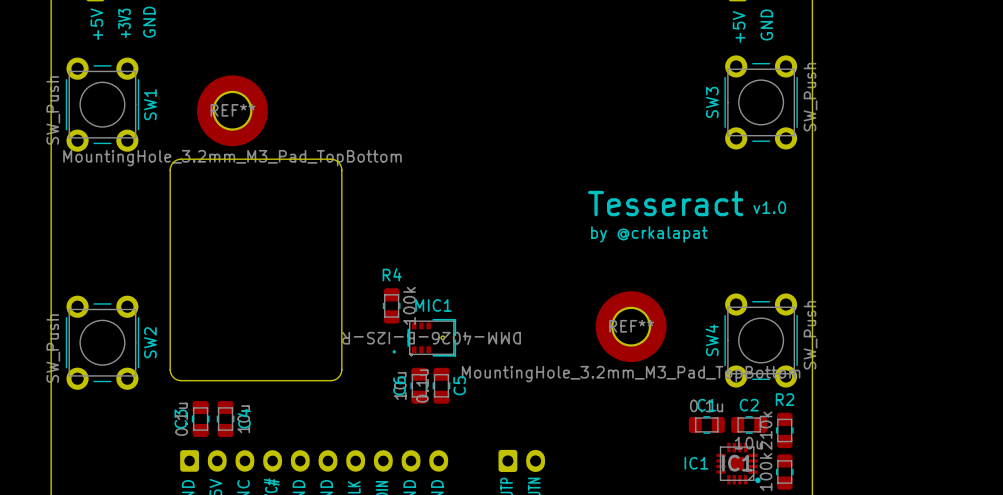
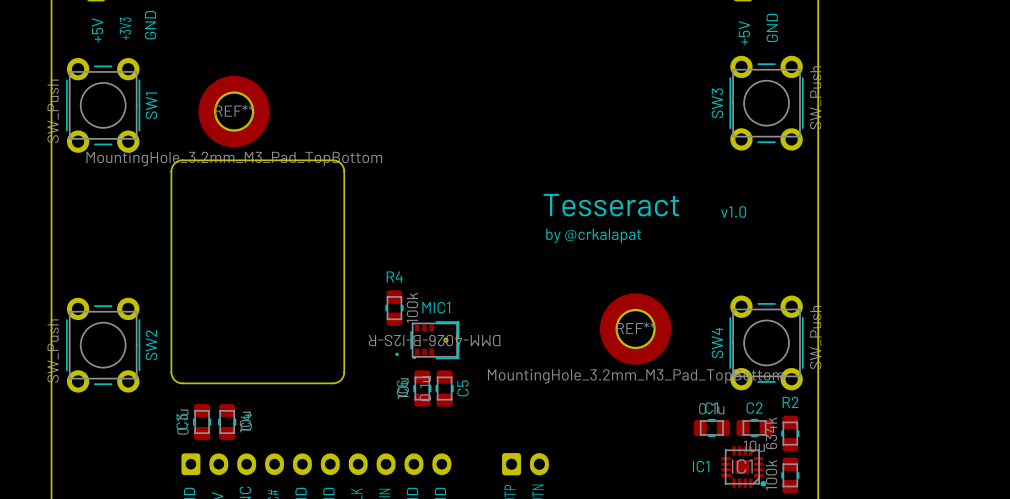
text position: Tesseract (665, 203) -> Tesseract (611, 205)
text position: v1.0 (769, 207) -> v1.0 (733, 211)
text position: by @crkalapat (649, 234) -> by @crkalapat (593, 235)
R2 value: 210k (766, 430) -> 634k (771, 433)

